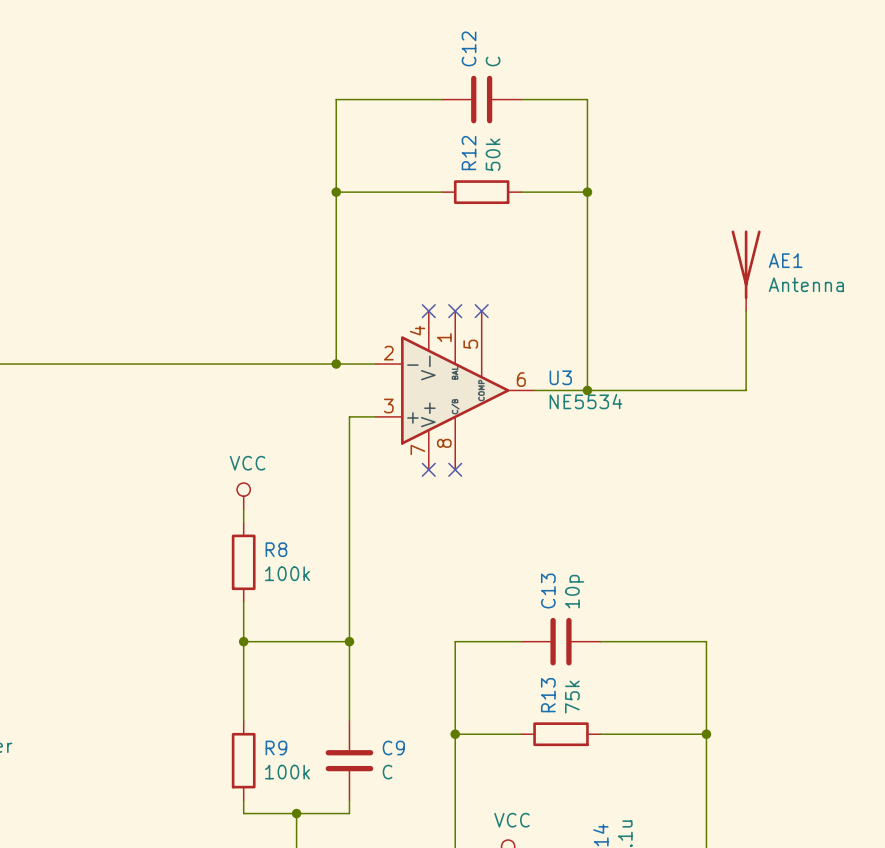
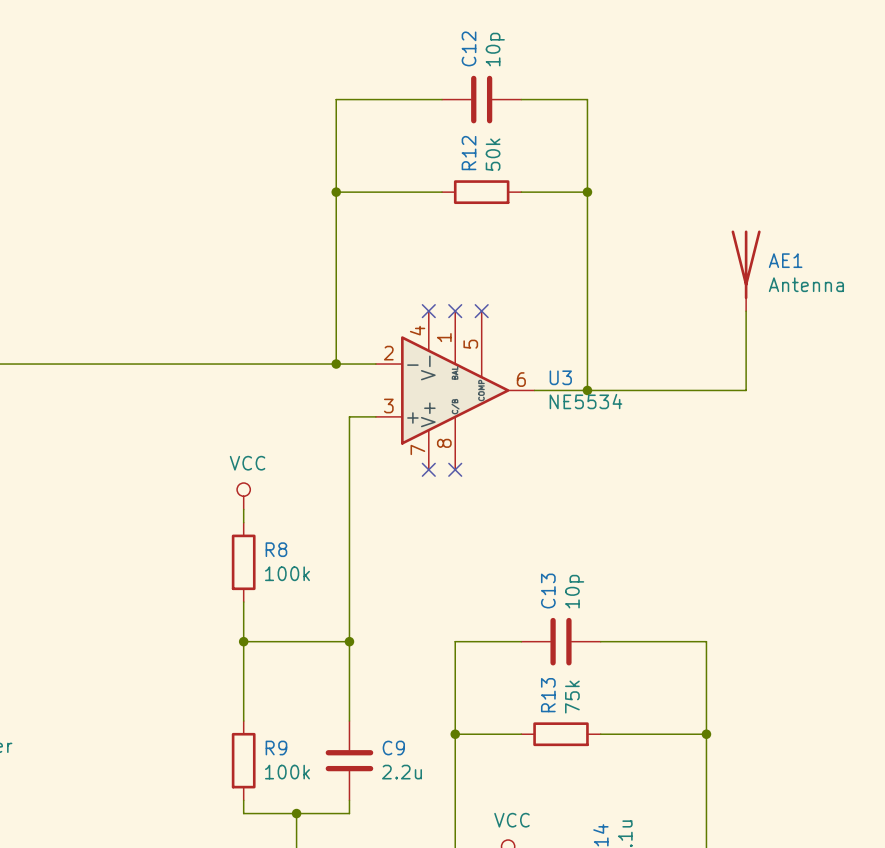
C12 value: C (493, 61) -> 10p (495, 49)
C9 value: C (387, 772) -> 2.2u (402, 772)

